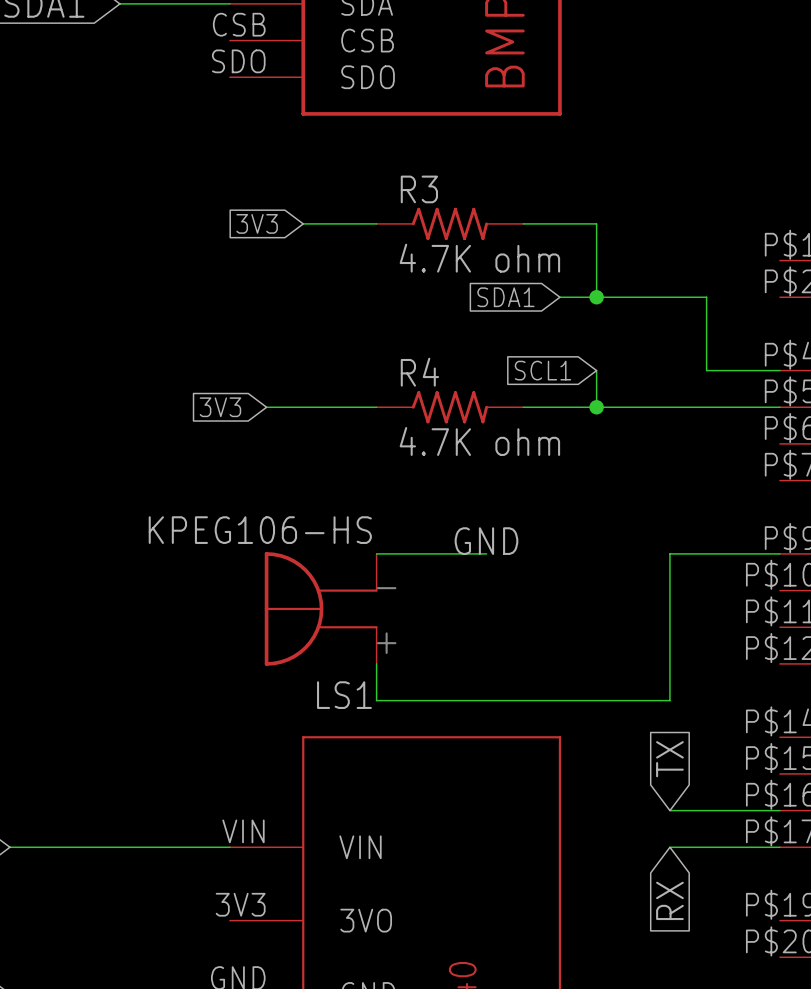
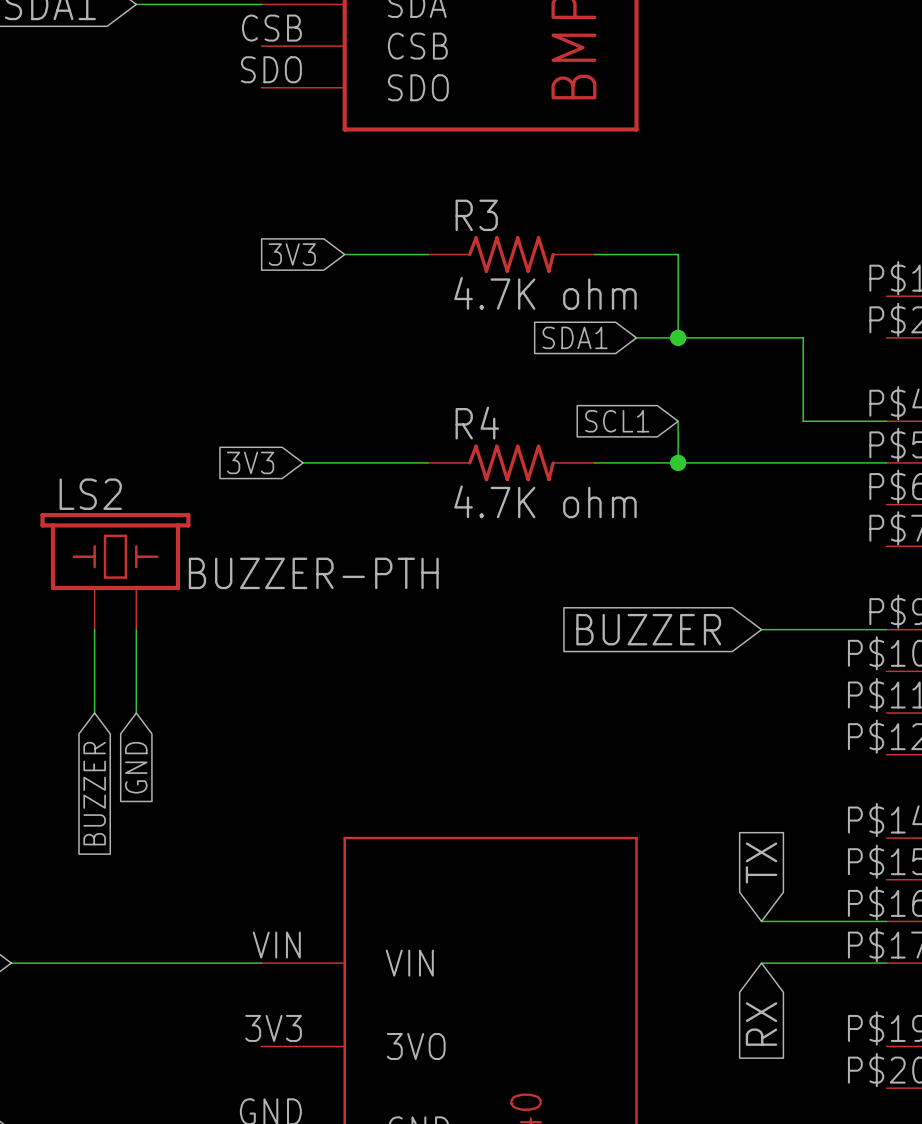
LS2: none -> BUZZER-PTH (115, 571)
label: GND (486, 541) -> none
wire: none -> (94, 629) (94, 713)
wire: none -> (136, 629) (136, 713)
wire: (376, 553) (486, 553) -> none
global label: none -> BUZZER (648, 629)
wire: (669, 553) (669, 700) (376, 700) (376, 663) -> none
LS1: KPEG106-HS (321, 608) -> none
global label: none -> GND (136, 767)
global label: none -> BUZZER (94, 793)

